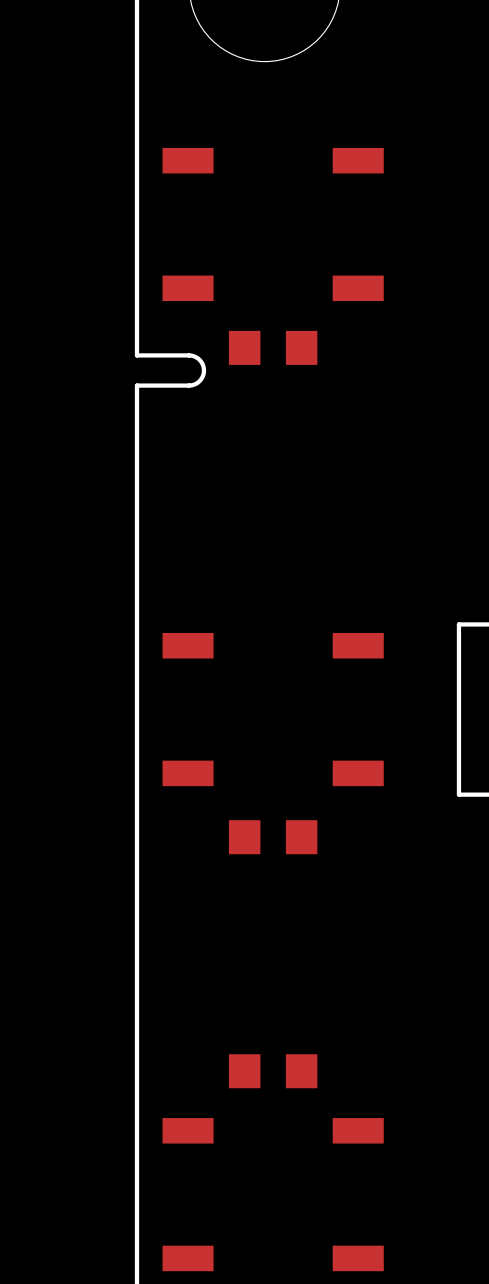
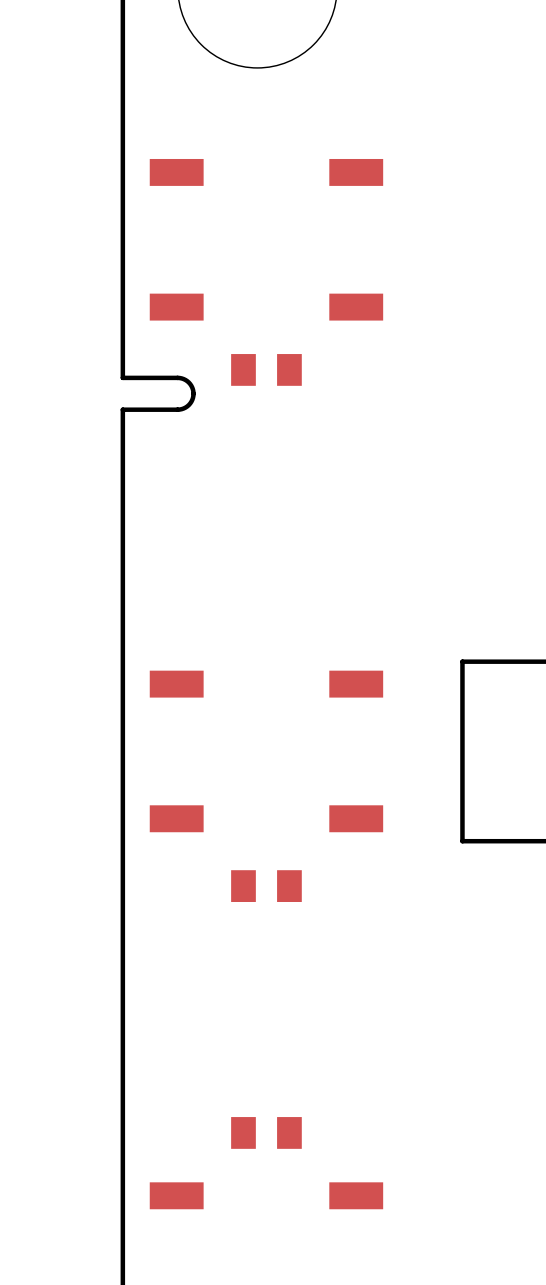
part footprint: [228, 330, 318, 365] -> [231, 354, 302, 386]
part footprint: [228, 820, 318, 855] -> [231, 870, 302, 903]
part footprint: [228, 1054, 318, 1089] -> [231, 1117, 302, 1149]

